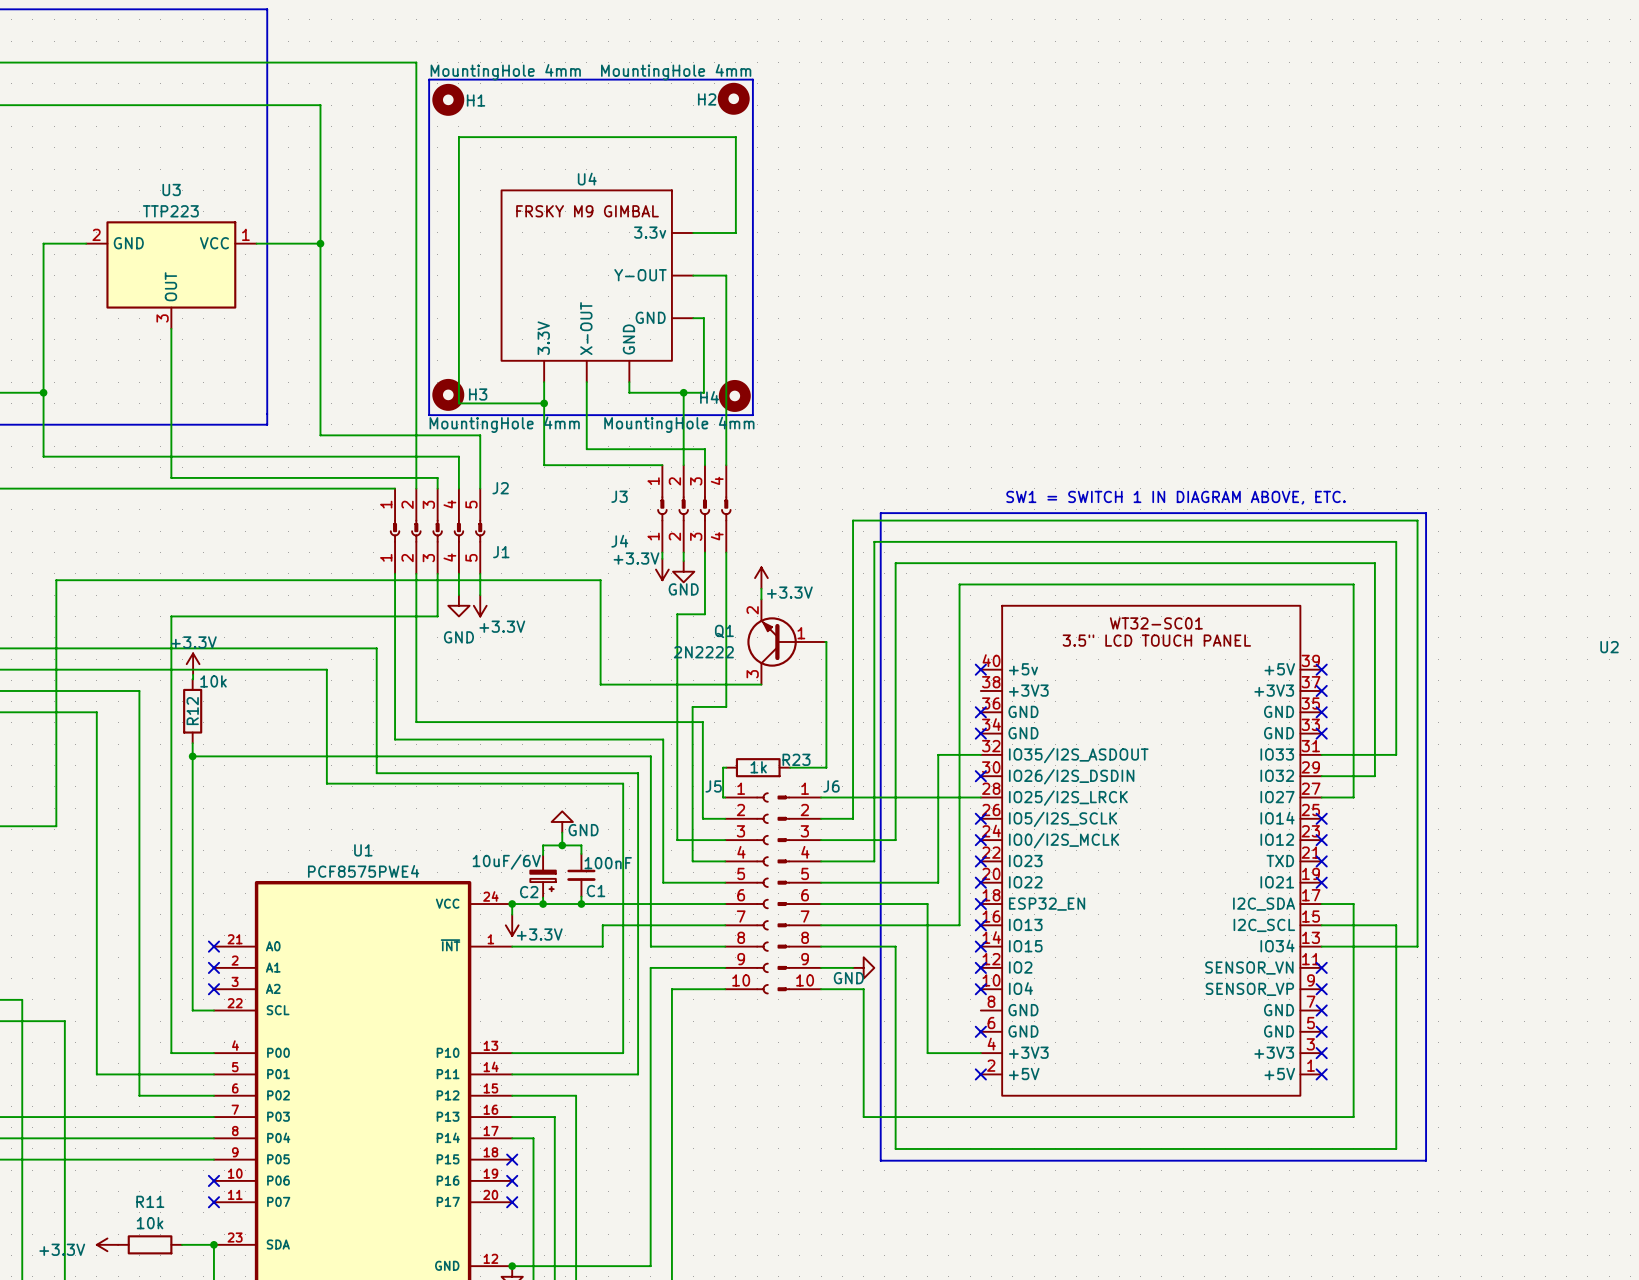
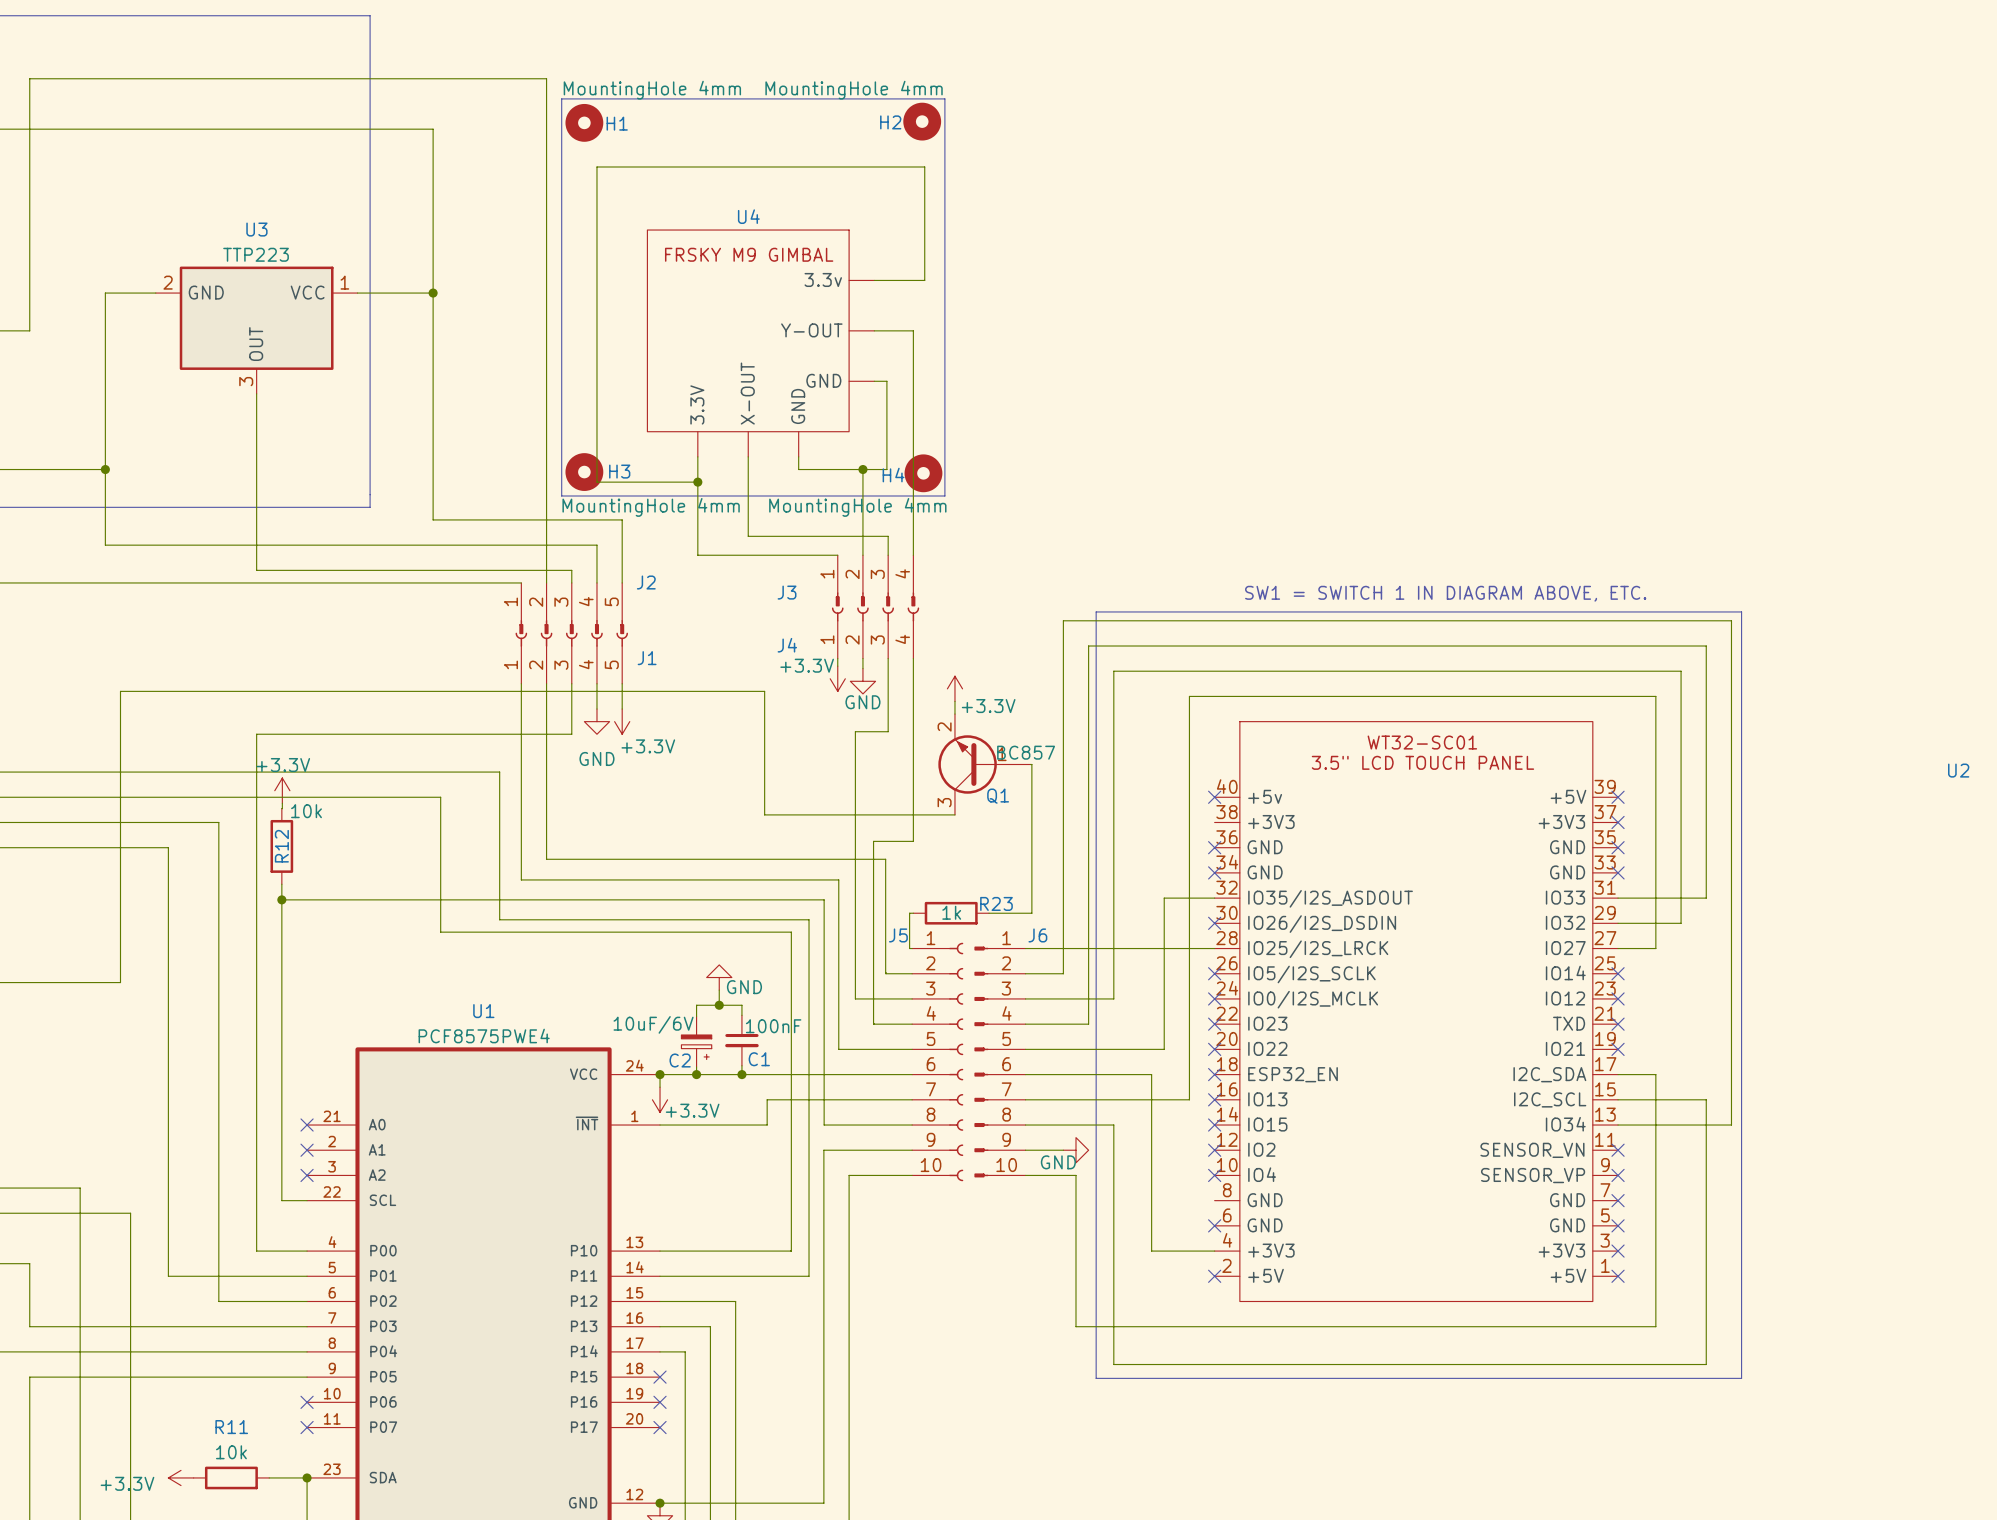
Q1 name position: Q1 (724, 631) -> Q1 (998, 796)
Q1 value: 2N2222 (703, 652) -> BC857 (1026, 752)

